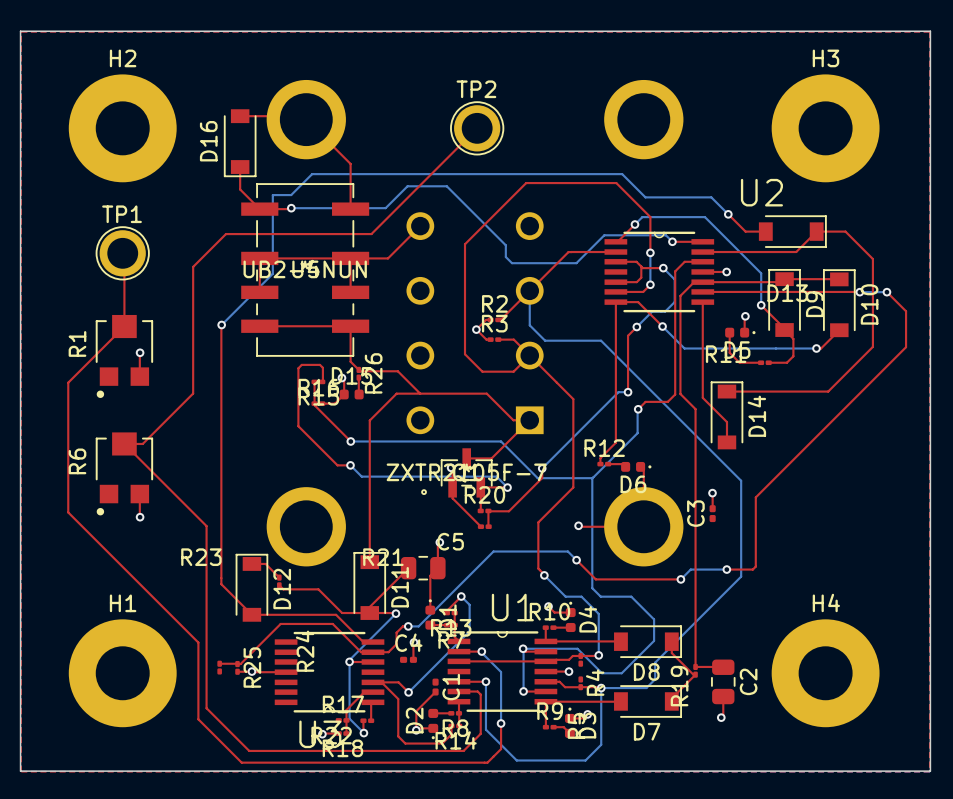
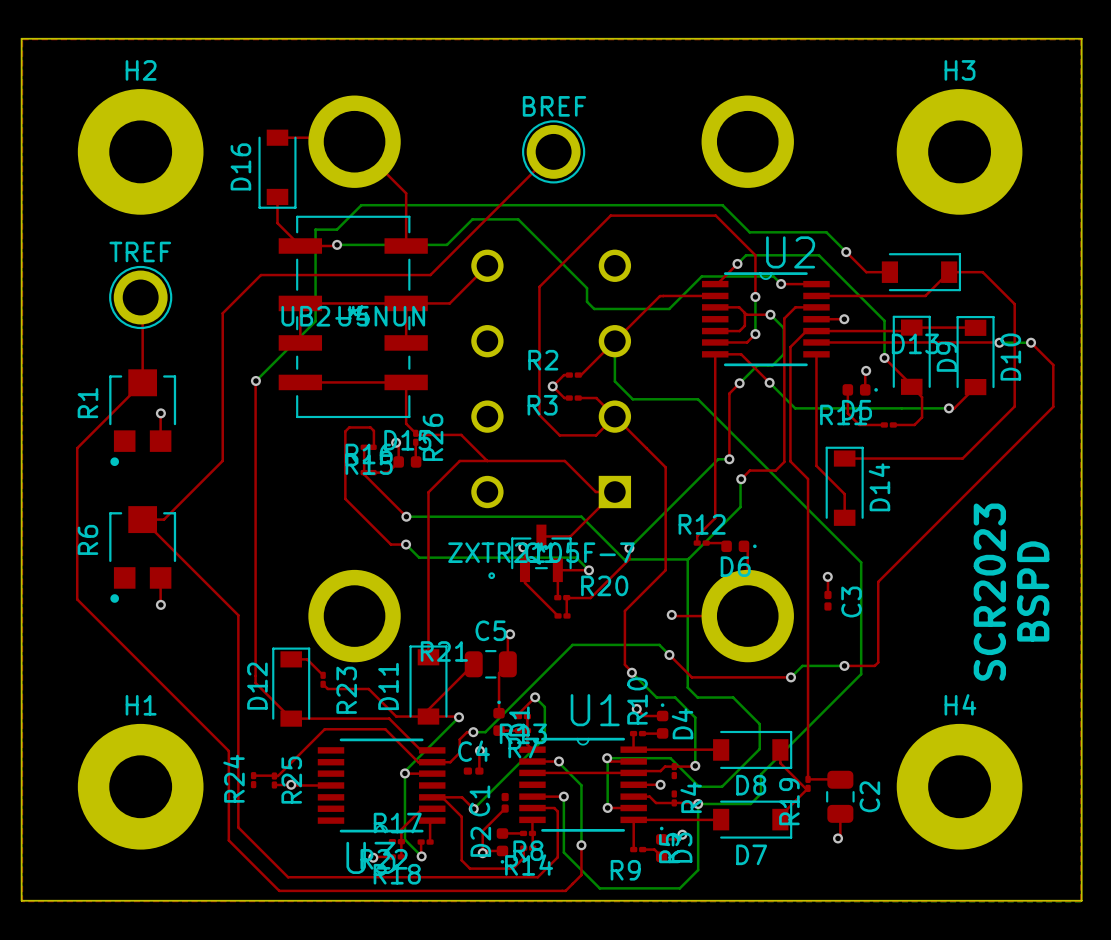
TP2 name: TP2 (476, 89) -> BREF (554, 106)
U2 name position: U2 (761, 192) -> U2 (790, 252)
TP1 name: TP1 (122, 214) -> TREF (140, 251)
R2 name position: R2 (494, 303) -> R2 (543, 360)
R3 name position: R3 (494, 323) -> R3 (542, 405)
R20 name position: R20 (484, 494) -> R20 (604, 585)
text: none -> BSPD (1033, 591)
text: none -> SCR2023 (989, 592)
C3 name position: C3 (695, 513) -> C3 (851, 602)
C5 name position: C5 (450, 541) -> C5 (490, 630)
R23 name rotation: 0° (201, 557) -> 90° counterclockwise (346, 690)
R23 name position: R23 (201, 557) -> R23 (346, 690)
D11 name position: D11 (400, 587) -> D11 (388, 686)
D12 name position: D12 (282, 589) -> D12 (257, 686)
R10 name rotation: 0° (549, 611) -> 90° counterclockwise (637, 701)
R24 name position: R24 (305, 651) -> R24 (234, 778)
C1 name position: C1 (451, 687) -> C1 (479, 800)
R9 name position: R9 (550, 711) -> R9 (625, 870)

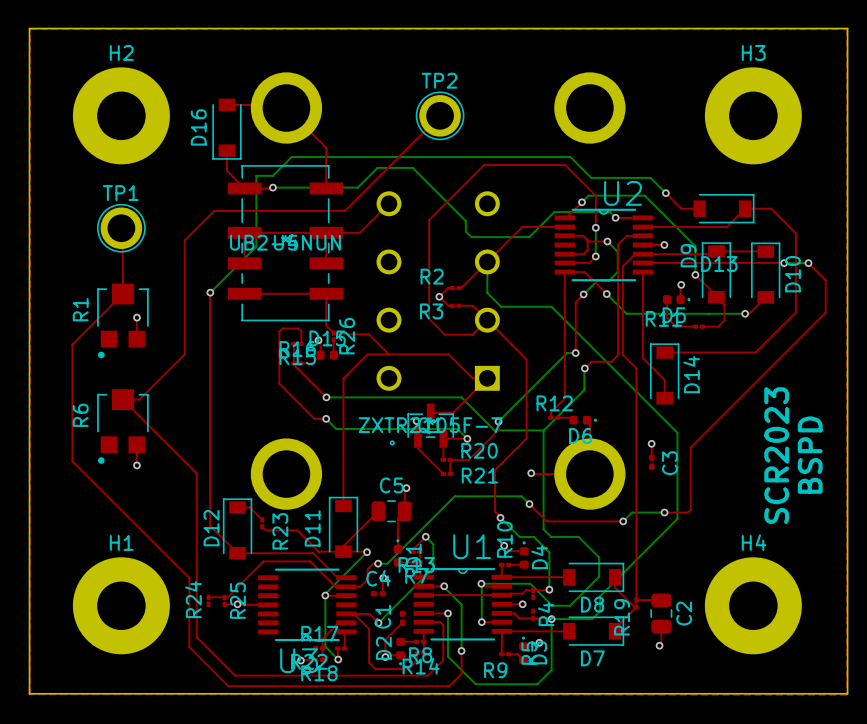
BREF name: BREF (554, 106) -> TP2 (439, 80)
TREF name: TREF (140, 251) -> TP1 (120, 193)
D9 name position: D9 (946, 356) -> D9 (688, 255)
R21 name position: R21 (444, 651) -> R21 (479, 475)

